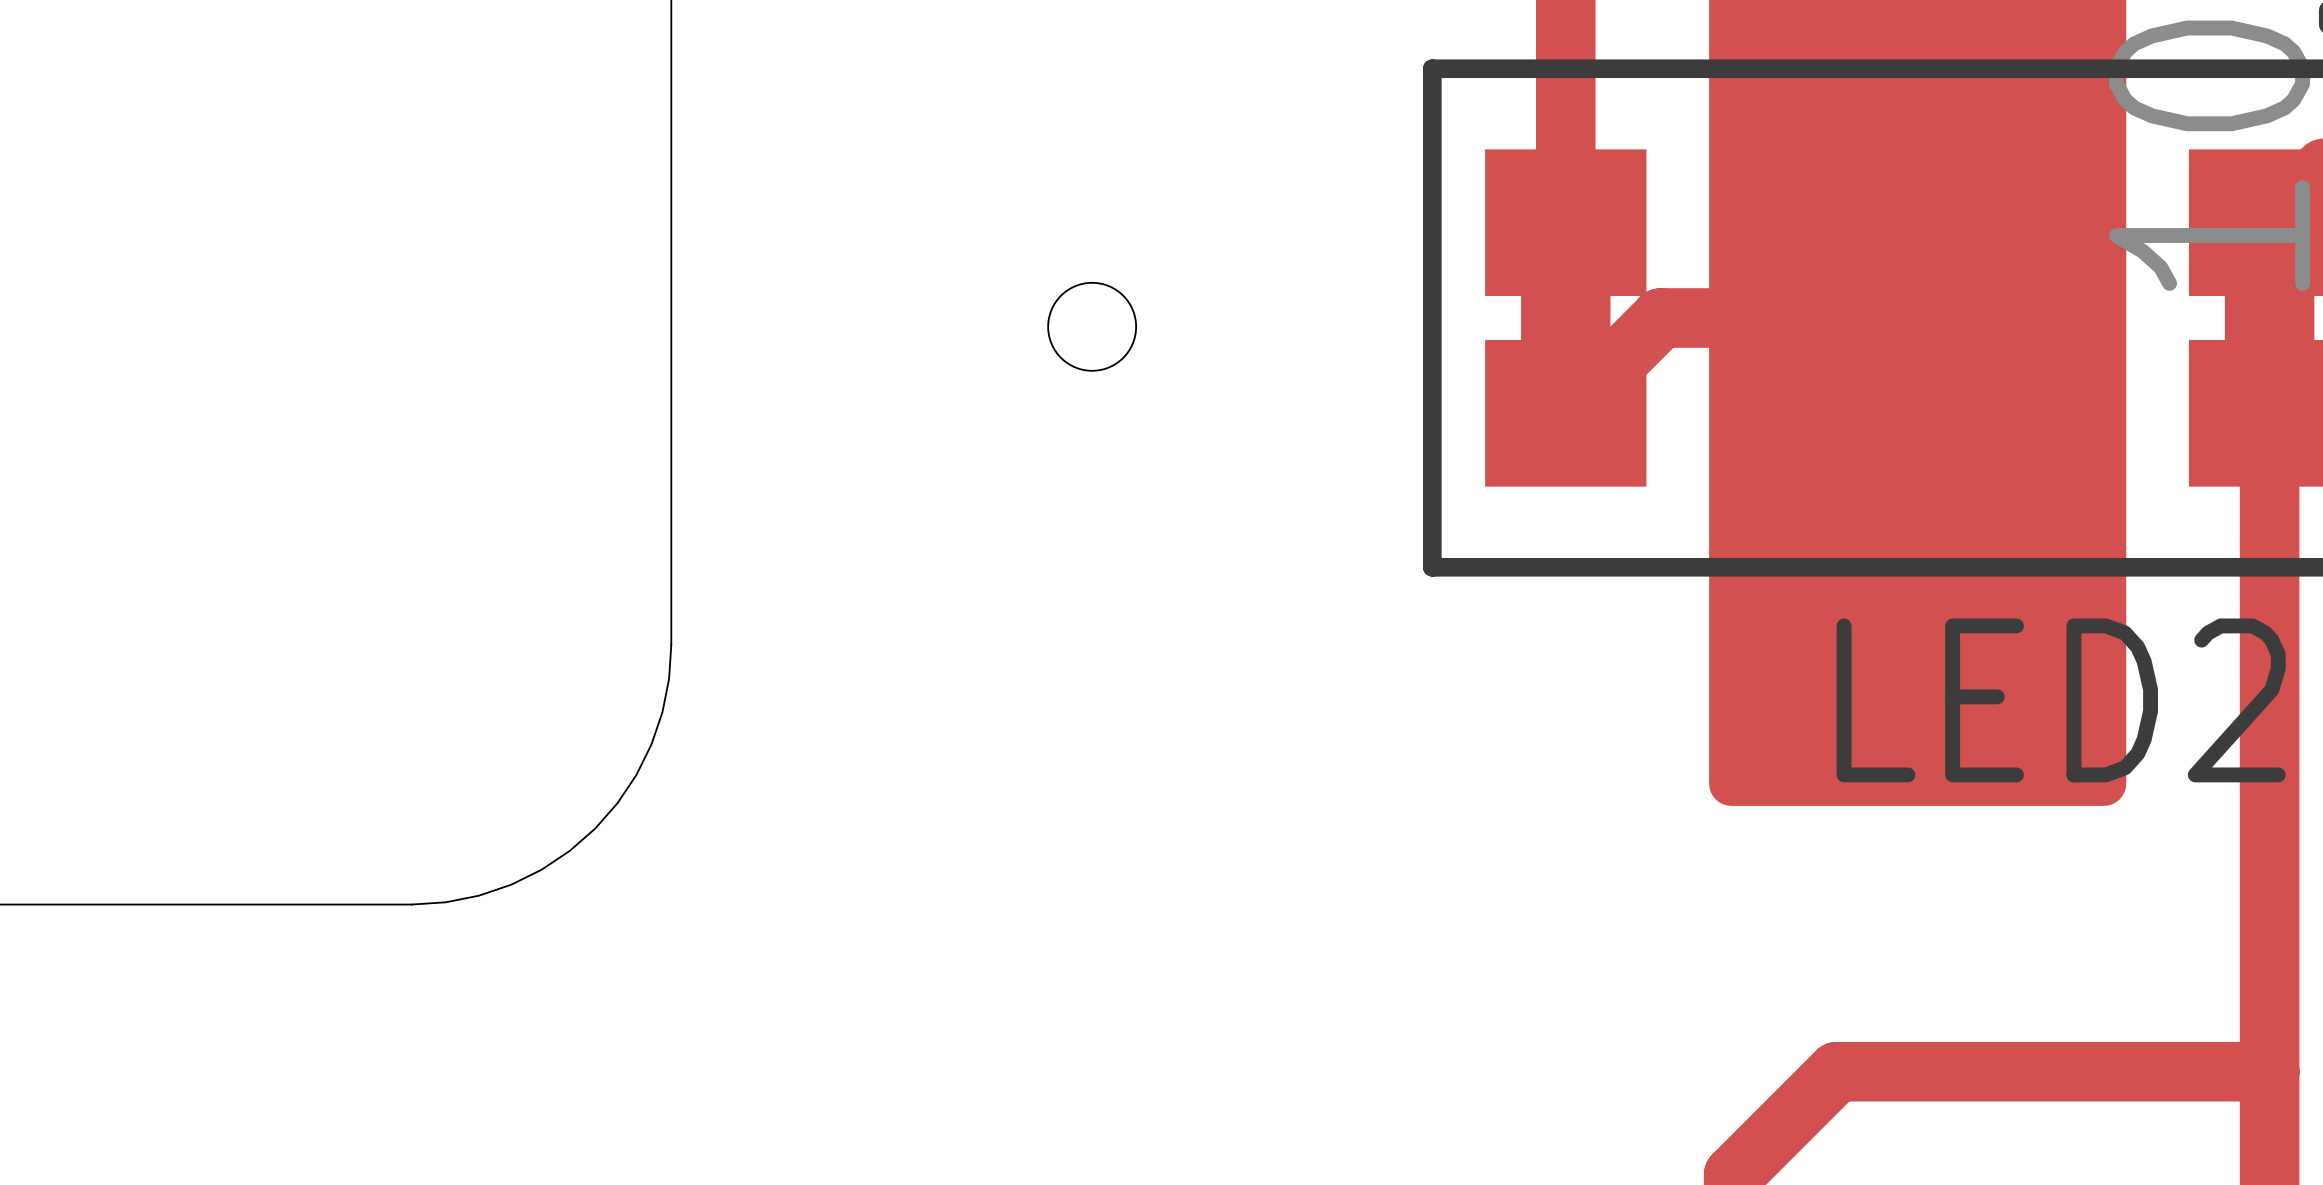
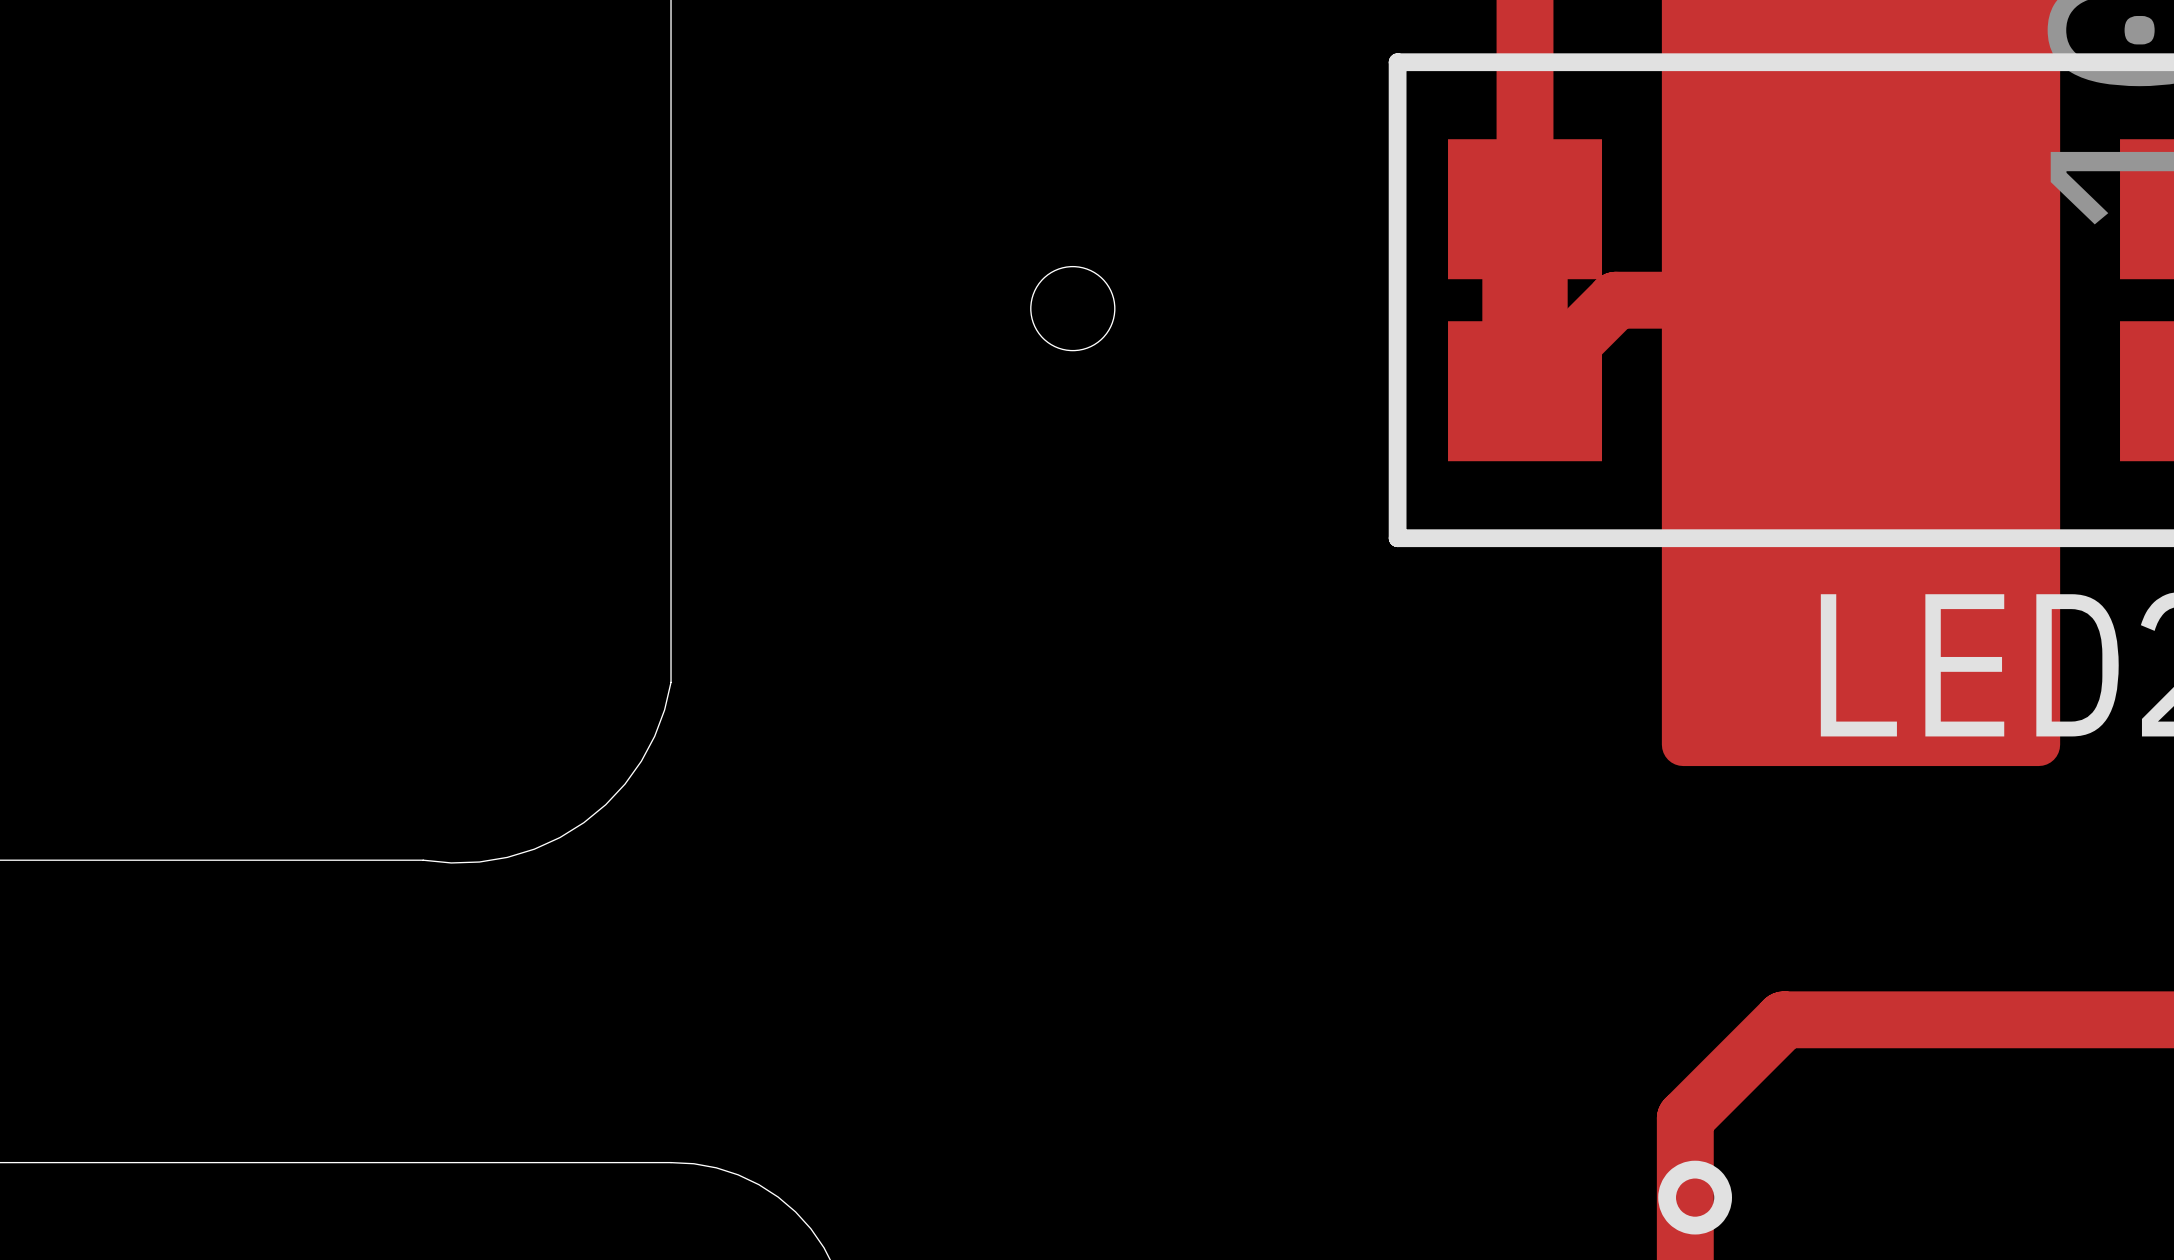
board edge: (671, 645) (669, 678) (662, 712) (651, 744) (636, 774) (617, 803) (595, 828) (569, 850) (541, 869) (511, 884) (478, 895) (445, 902) (411, 904) -> (671, 612) (671, 682) (664, 709) (654, 736) (641, 761) (625, 784) (605, 804) (583, 822) (559, 837) (534, 849) (507, 857) (479, 862) (451, 862) (423, 860)

